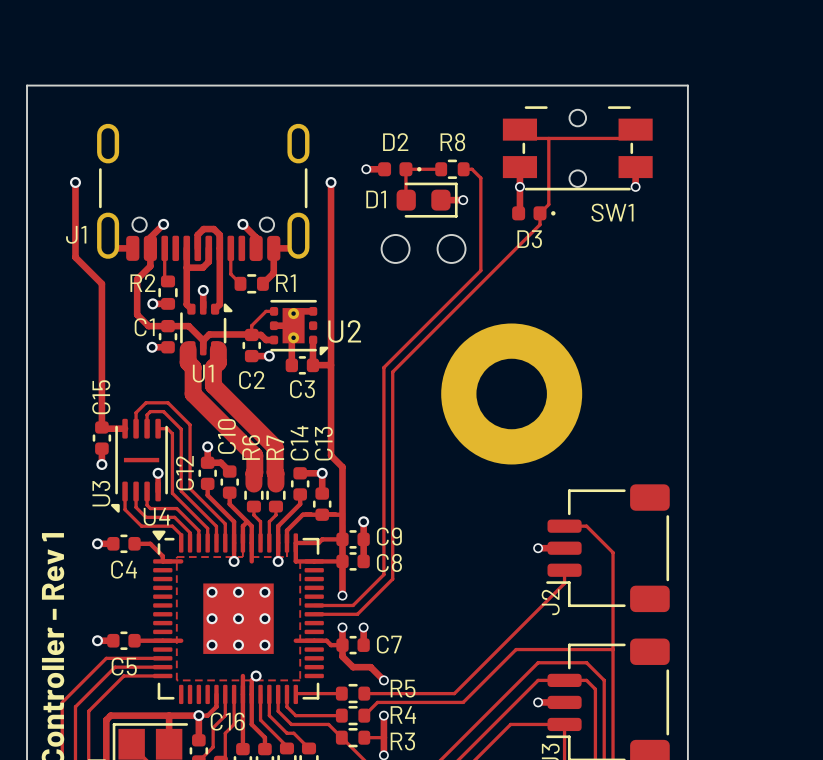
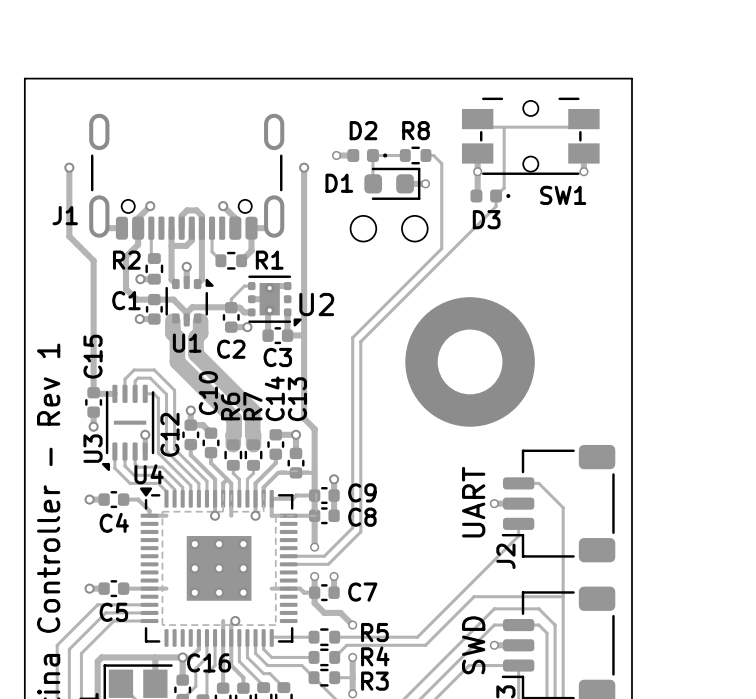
text: none -> UART (473, 502)
text: none -> SWD (473, 645)

